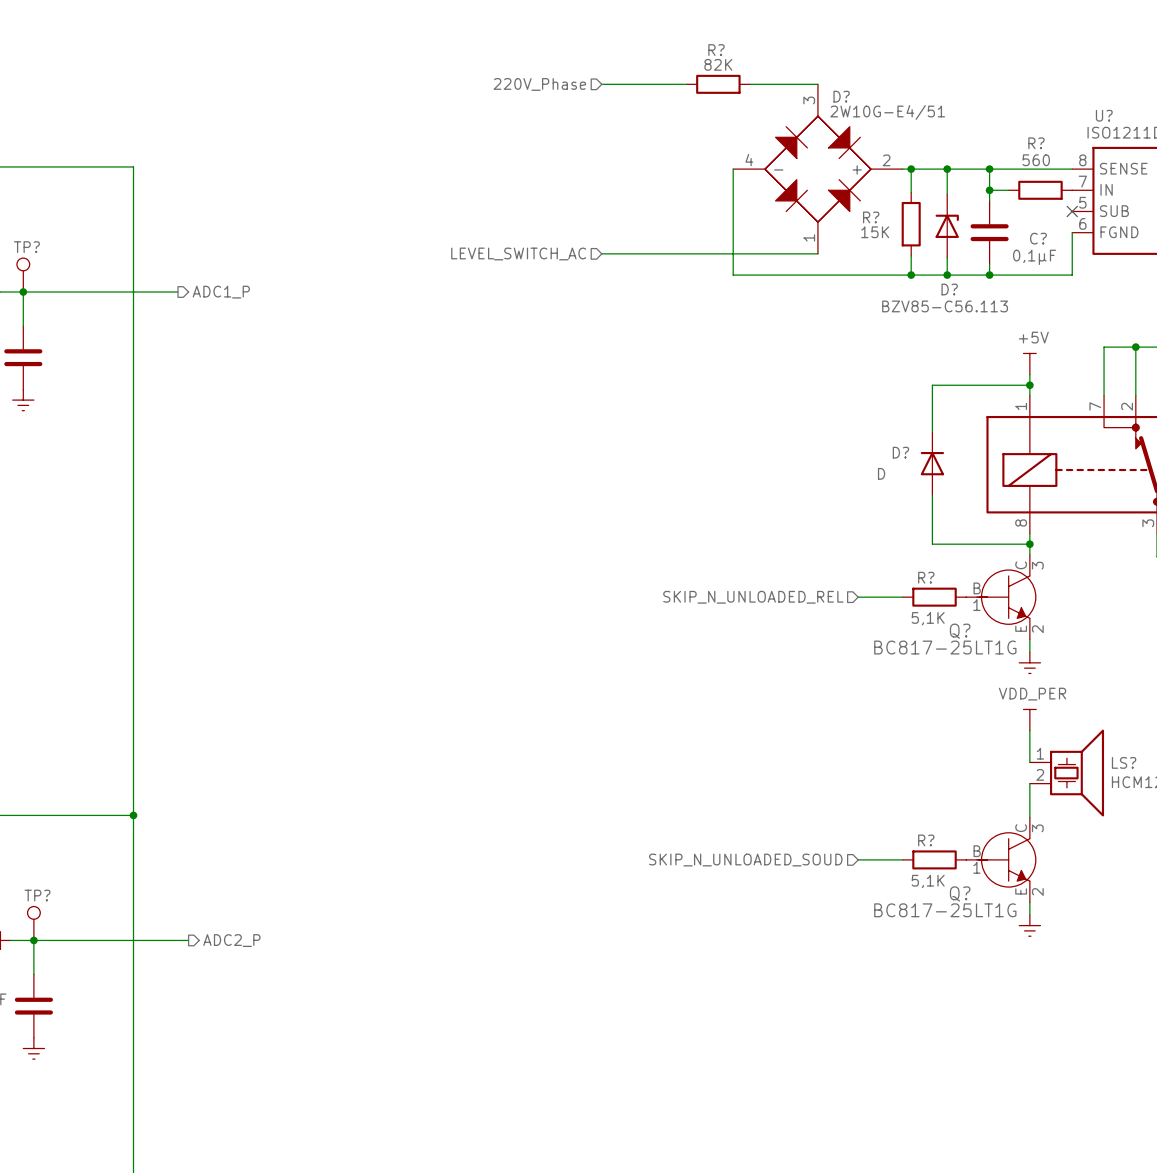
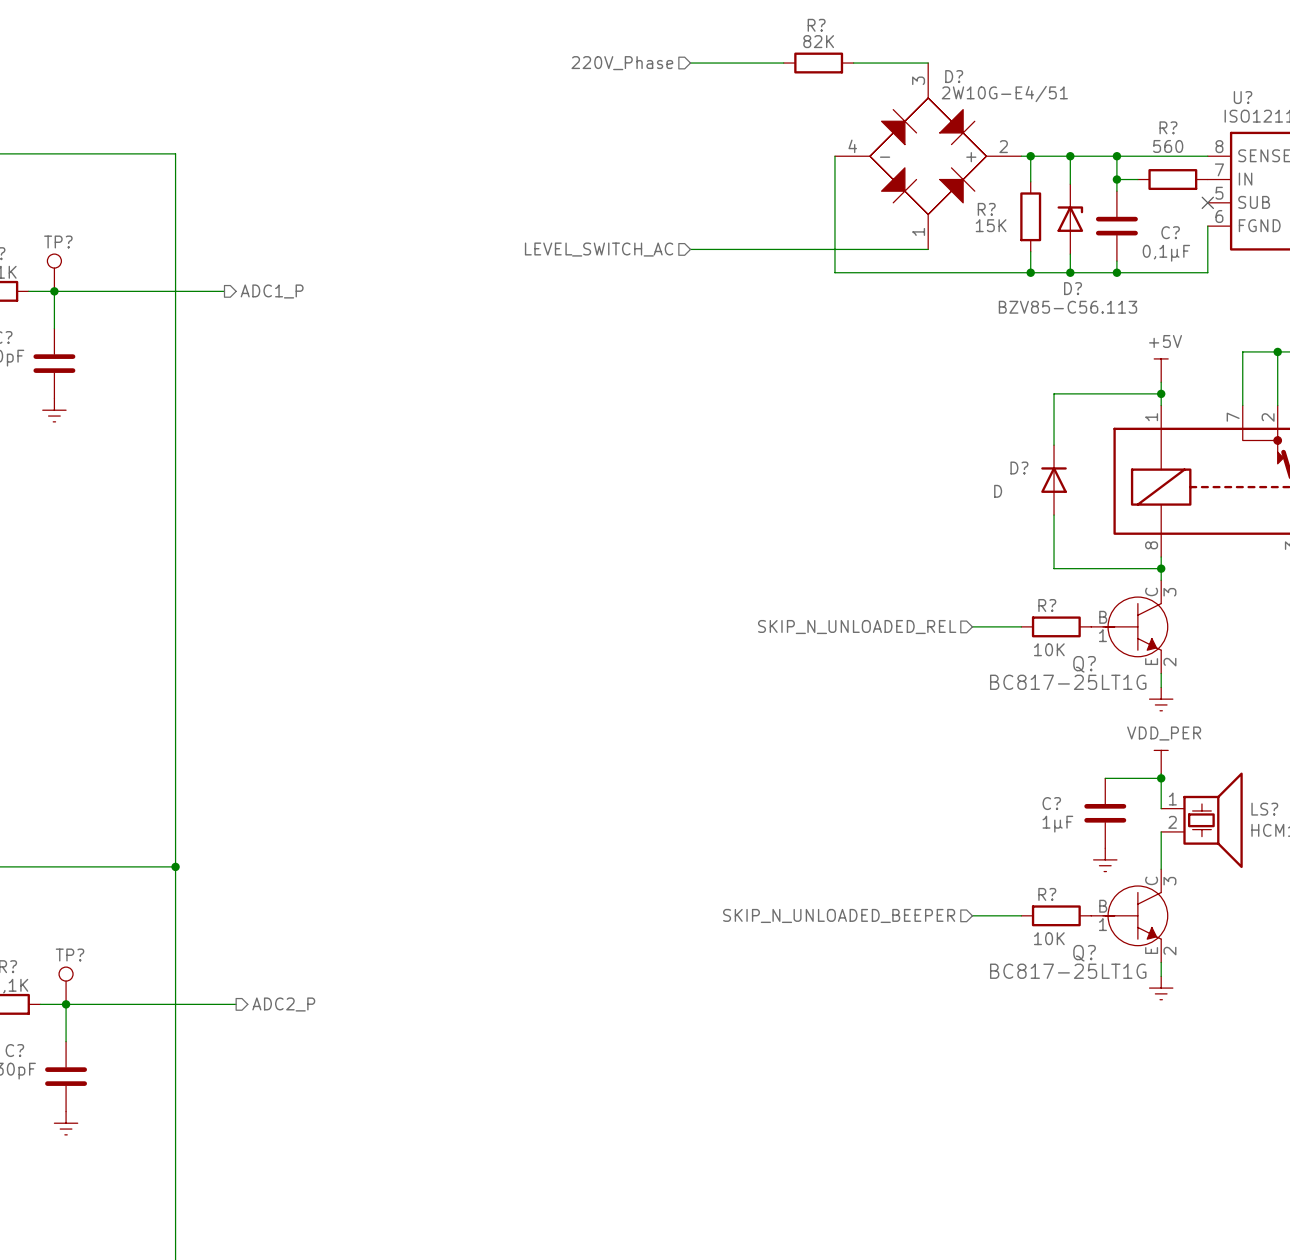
R? value: 5,1K (928, 618) -> 10K (1049, 649)
wire: none -> (1105, 778) (1161, 778)
junction: none -> (1161, 778)
C?: none -> 1µF (1105, 813)
power symbol: none -> (1105, 859)
hierarchical label: SKIP_N_UNLOADED_SOUD (745, 860) -> SKIP_N_UNLOADED_BEEPER (839, 915)
R? value: 5,1K (928, 881) -> 10K (1049, 938)

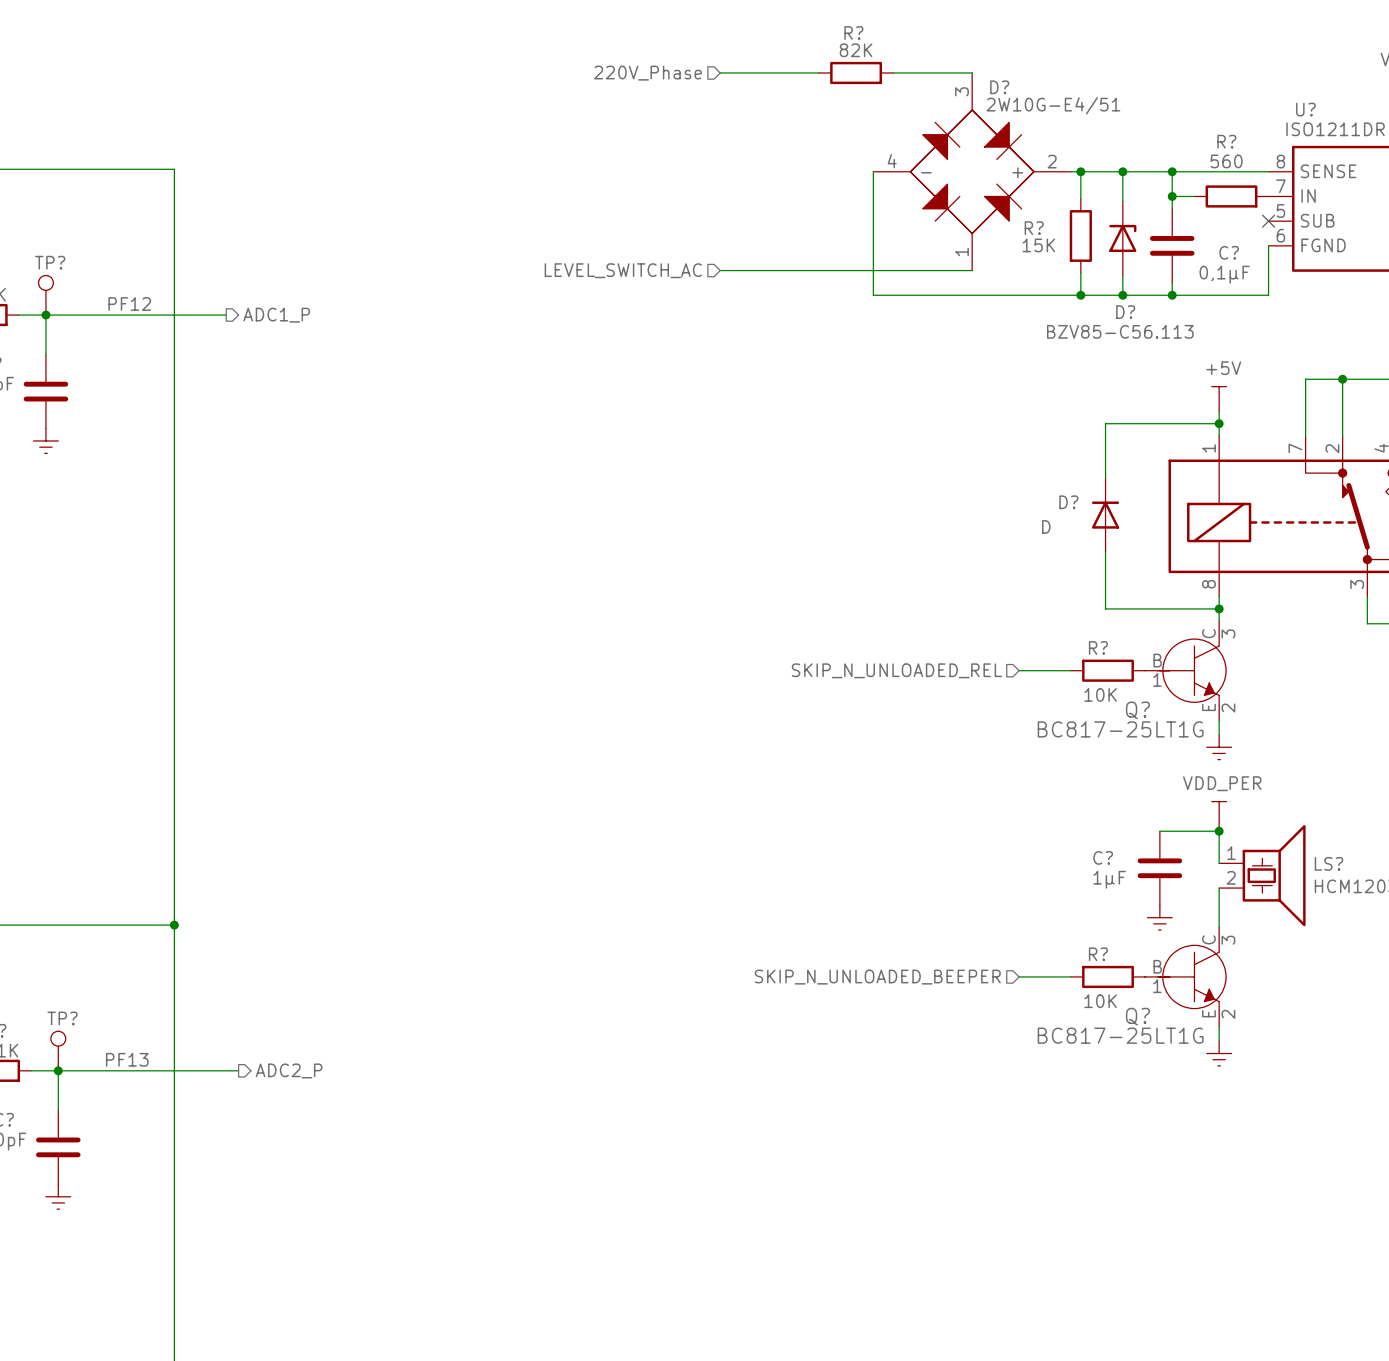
label: none -> PF12 (129, 304)
label: none -> PF13 (127, 1059)

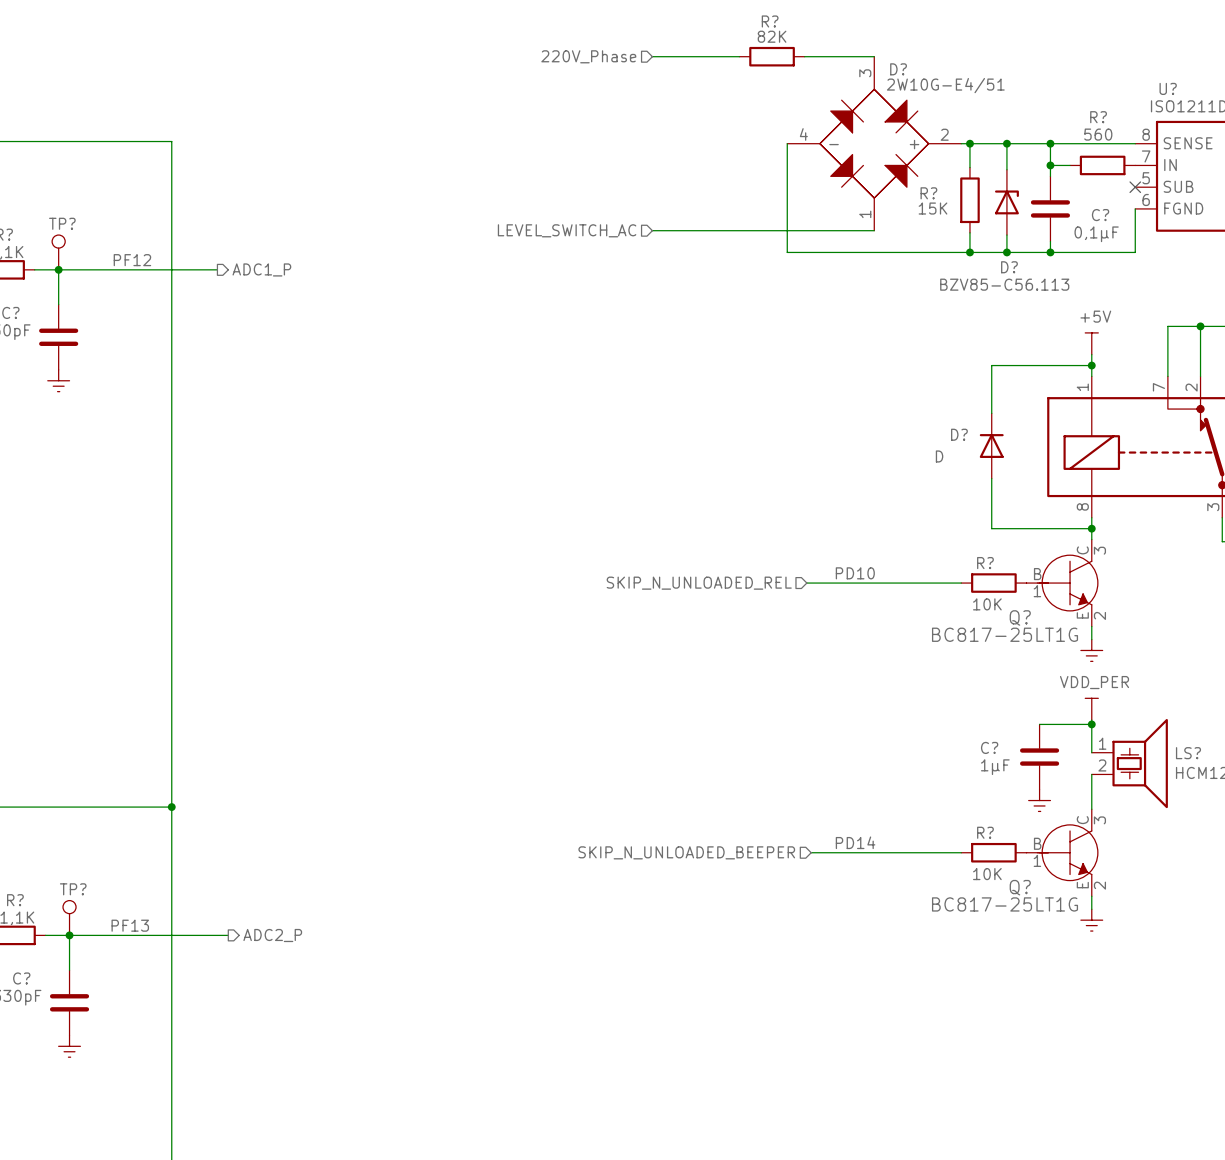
label: none -> PD10 (855, 573)
wire: none -> (806, 583) (915, 583)
hierarchical label position: SKIP_N_UNLOADED_REL (896, 670) -> SKIP_N_UNLOADED_REL (699, 583)
label: none -> PD14 (855, 842)
wire: none -> (811, 852) (915, 852)
hierarchical label position: SKIP_N_UNLOADED_BEEPER (877, 977) -> SKIP_N_UNLOADED_BEEPER (686, 852)

